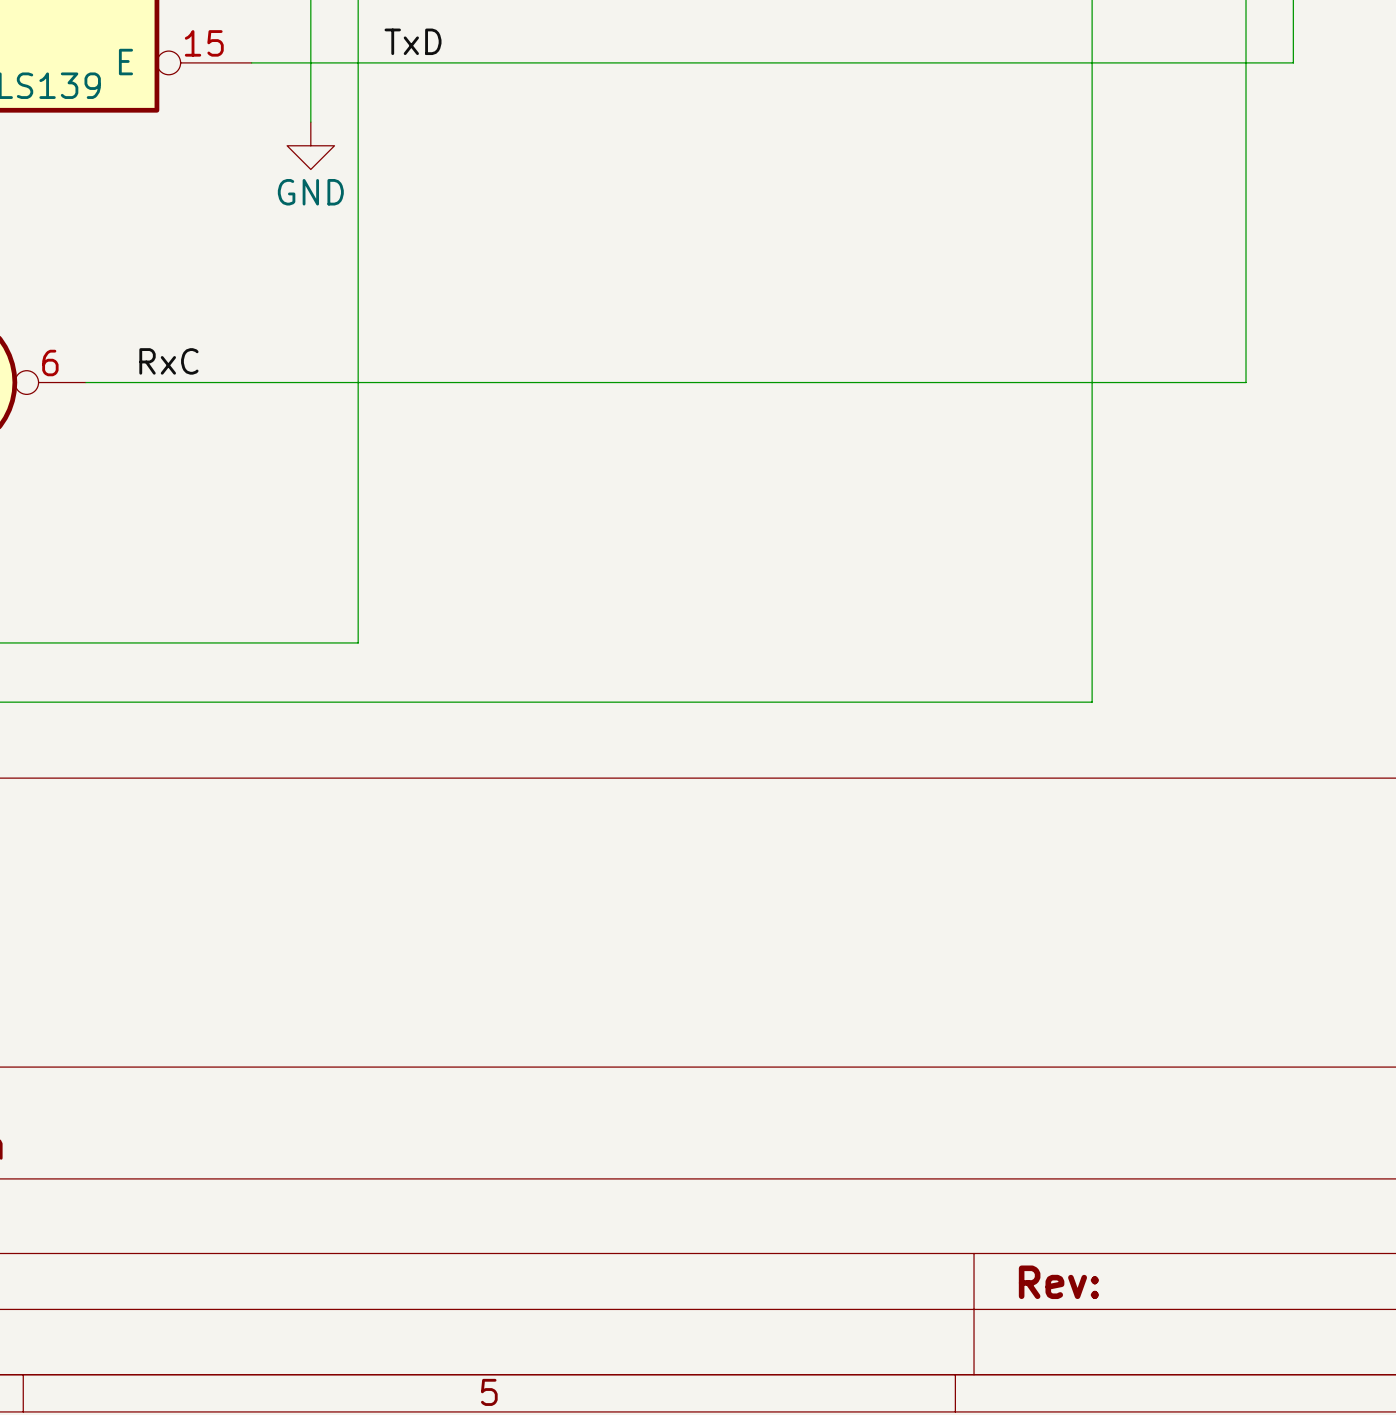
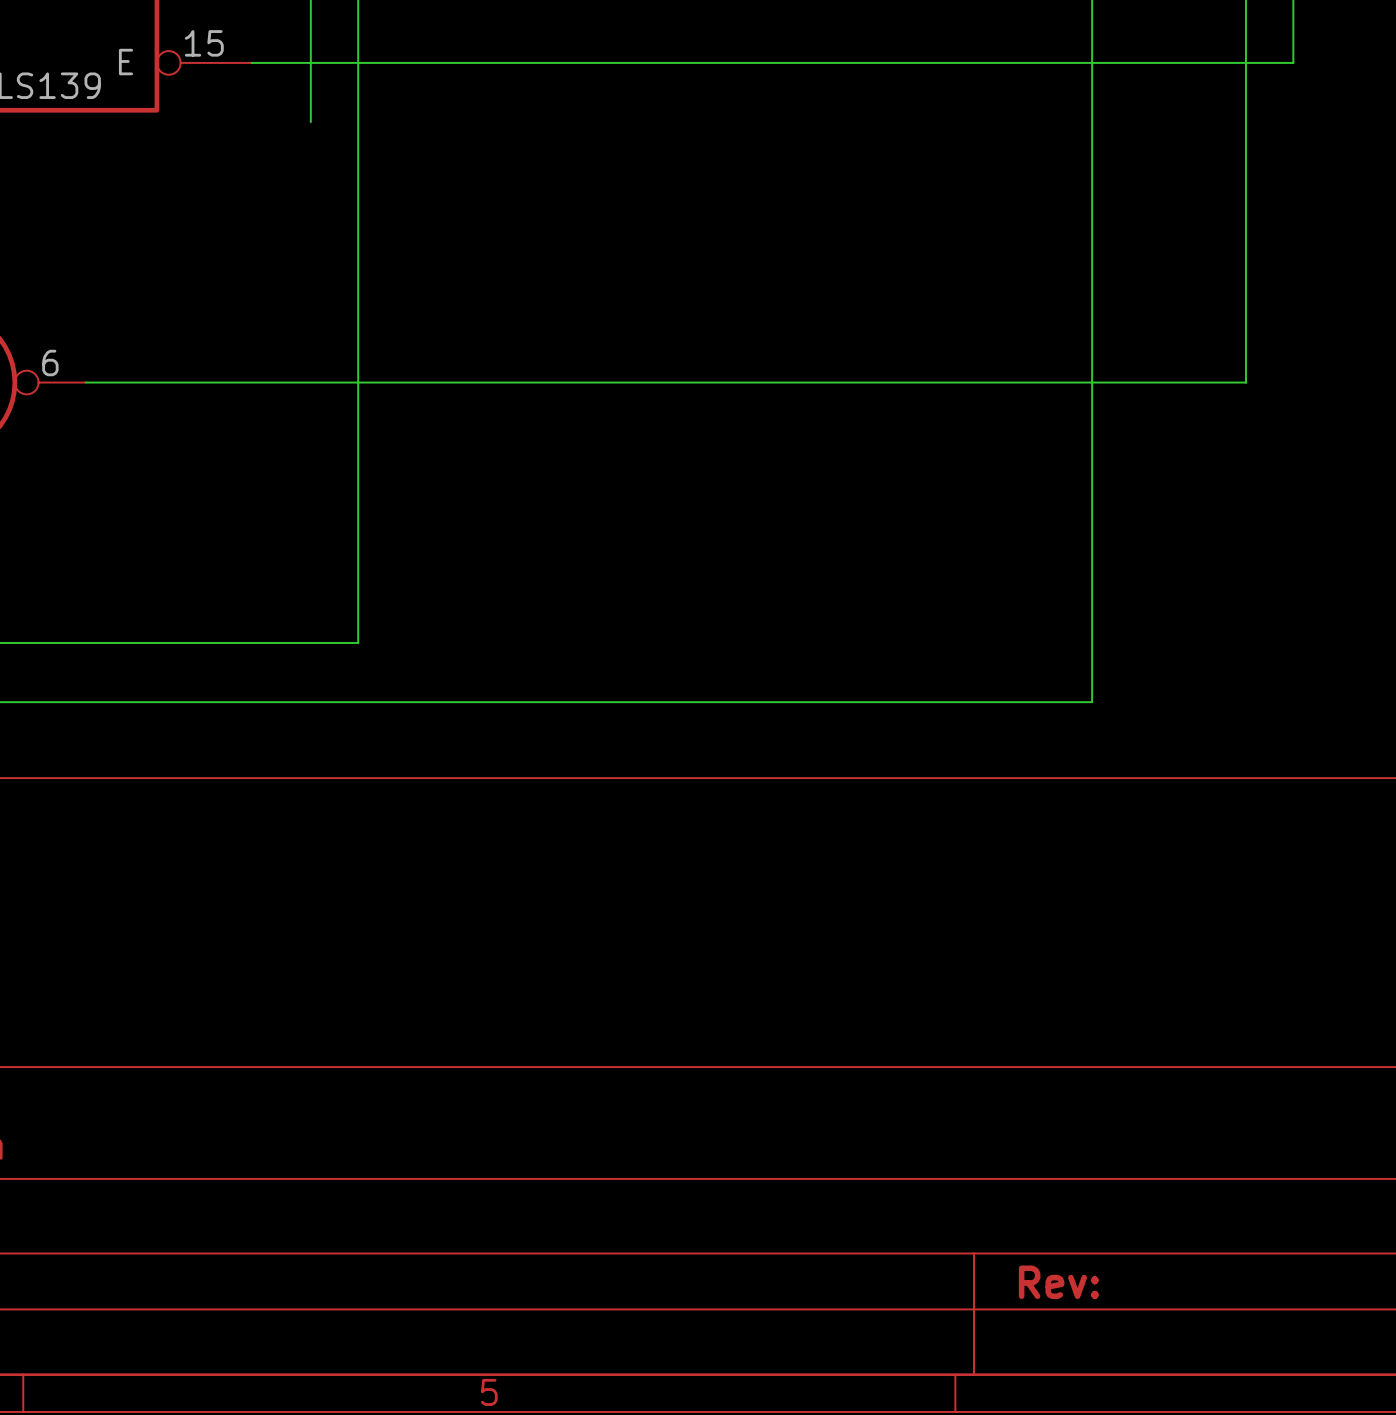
label: TxD (413, 41) -> none
power symbol: GND (310, 145) -> none
label: RxC (168, 361) -> none

